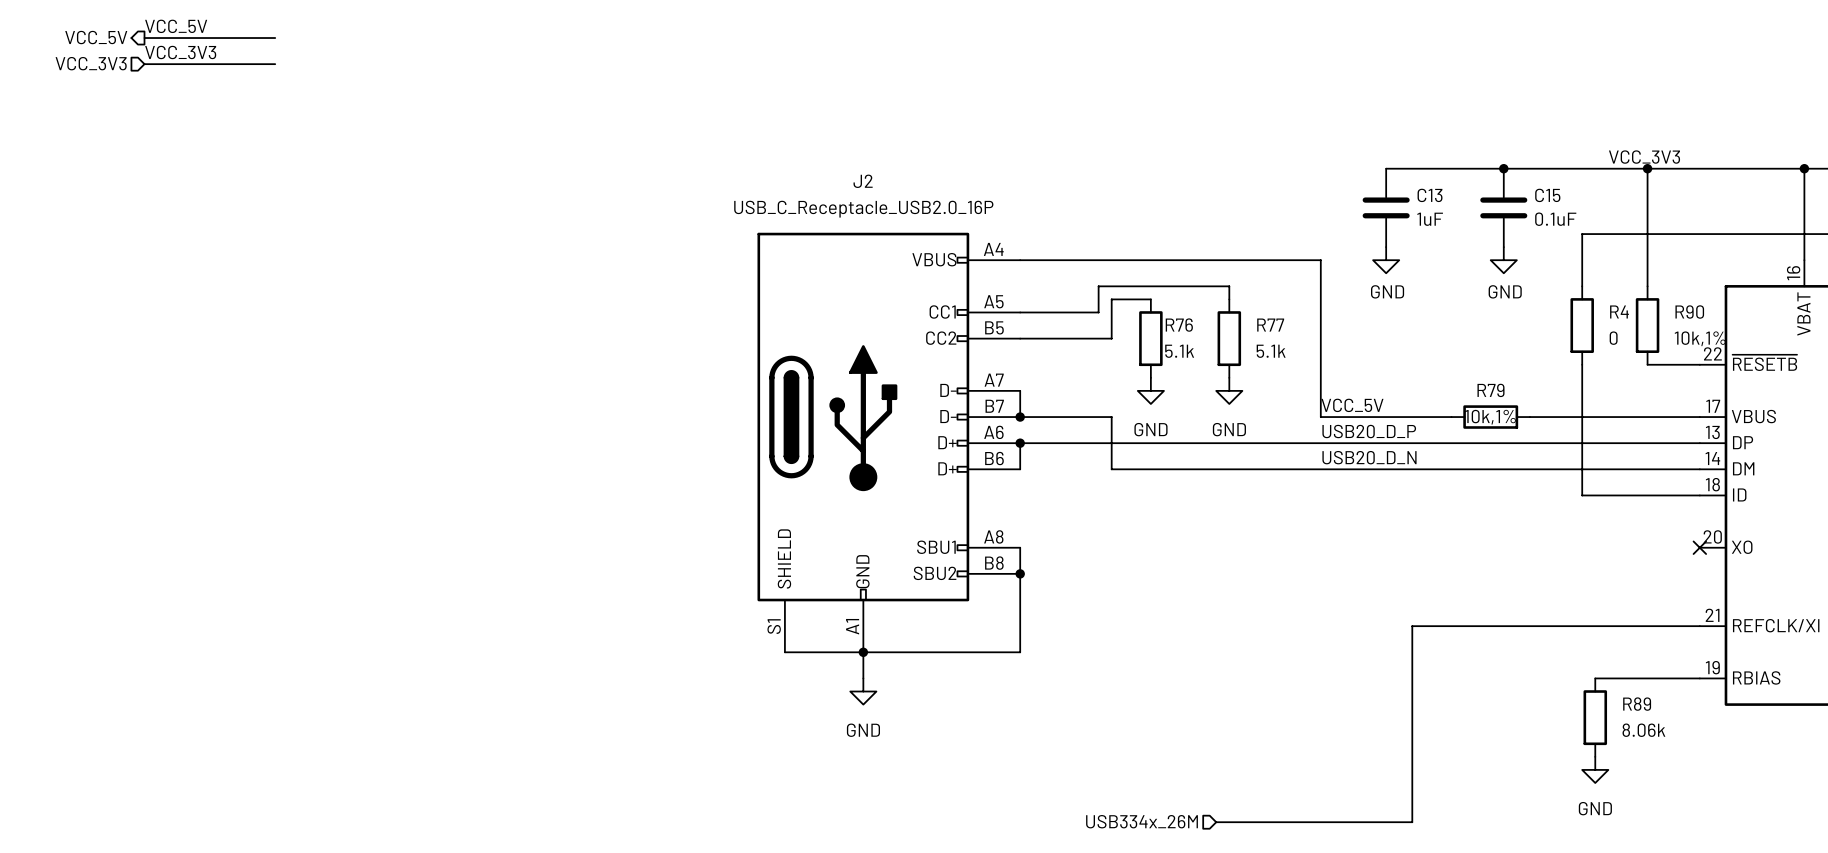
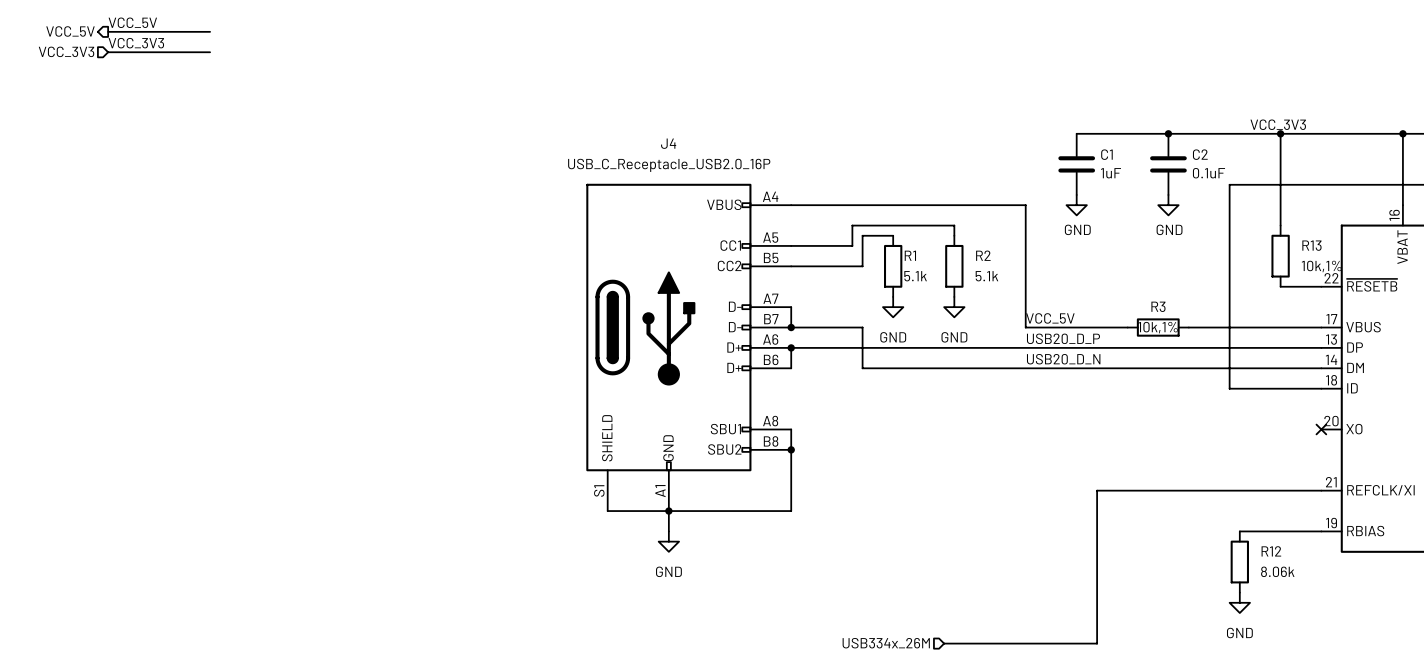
J2 name: J2 (863, 181) -> J4 (668, 143)
C13 name: C13 (1430, 195) -> C1 (1106, 154)
C15 name: C15 (1547, 195) -> C2 (1200, 154)
wire: none -> (1229, 225) (1229, 286)
R90 name: R90 (1689, 312) -> R13 (1311, 245)
R76 name: R76 (1179, 325) -> R1 (910, 255)
R77 name: R77 (1270, 325) -> R2 (983, 255)
R4: 0 (1582, 325) -> none
R79 name: R79 (1490, 390) -> R3 (1158, 306)
R89 name: R89 (1637, 704) -> R12 (1271, 551)

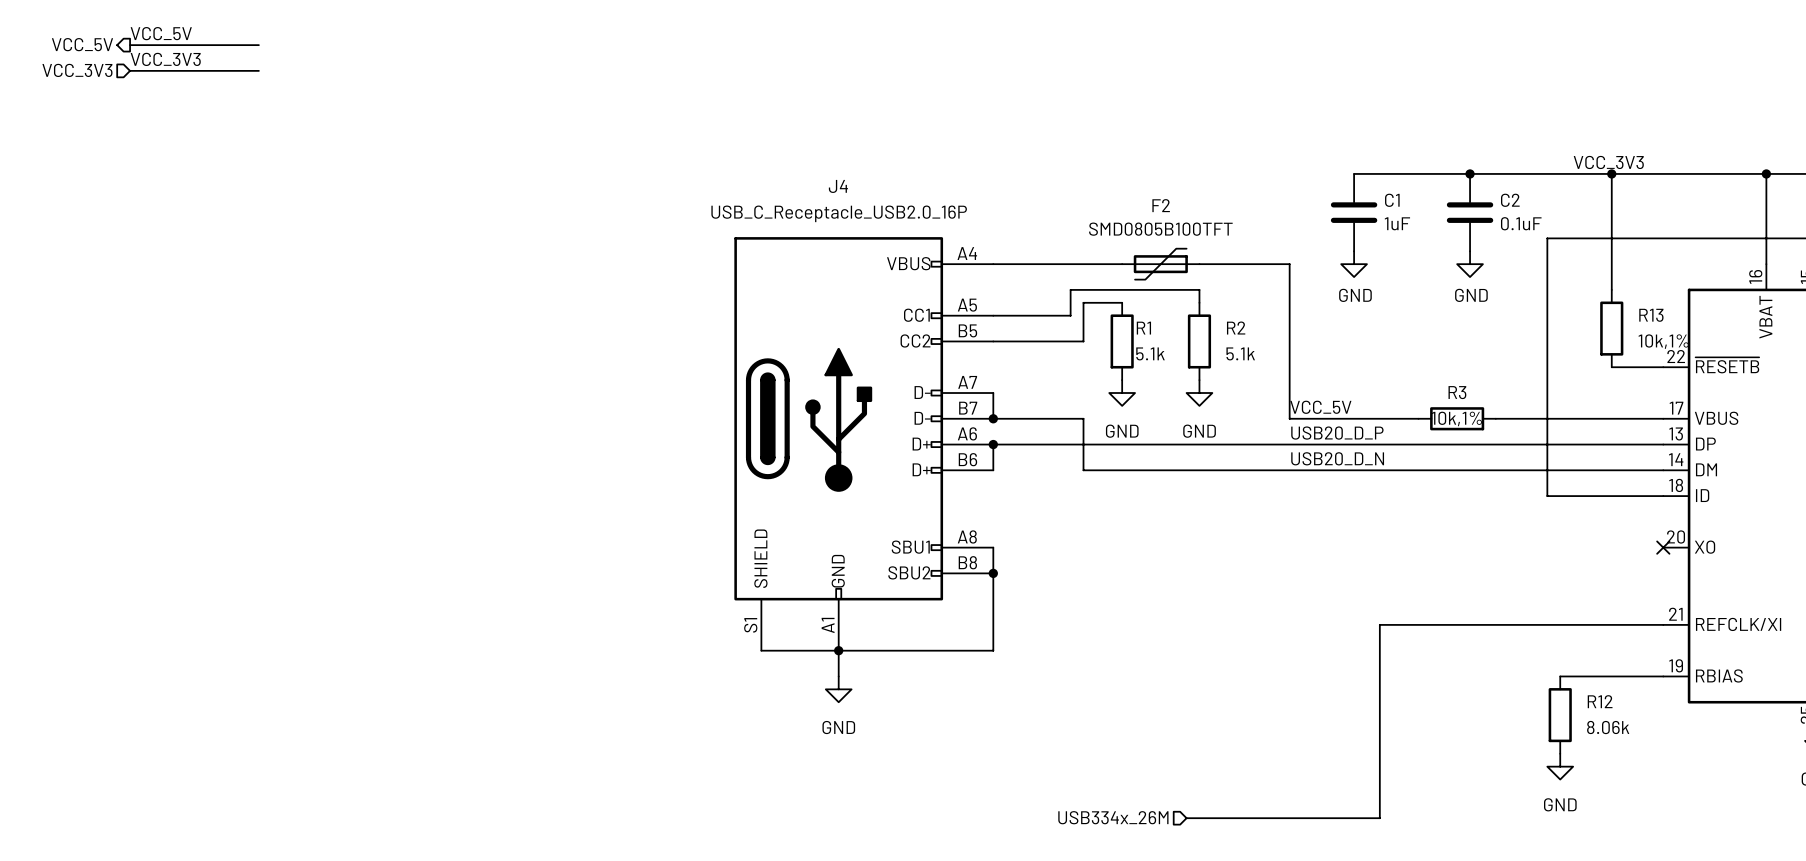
F2: none -> SMD0805B100TFT (1160, 264)

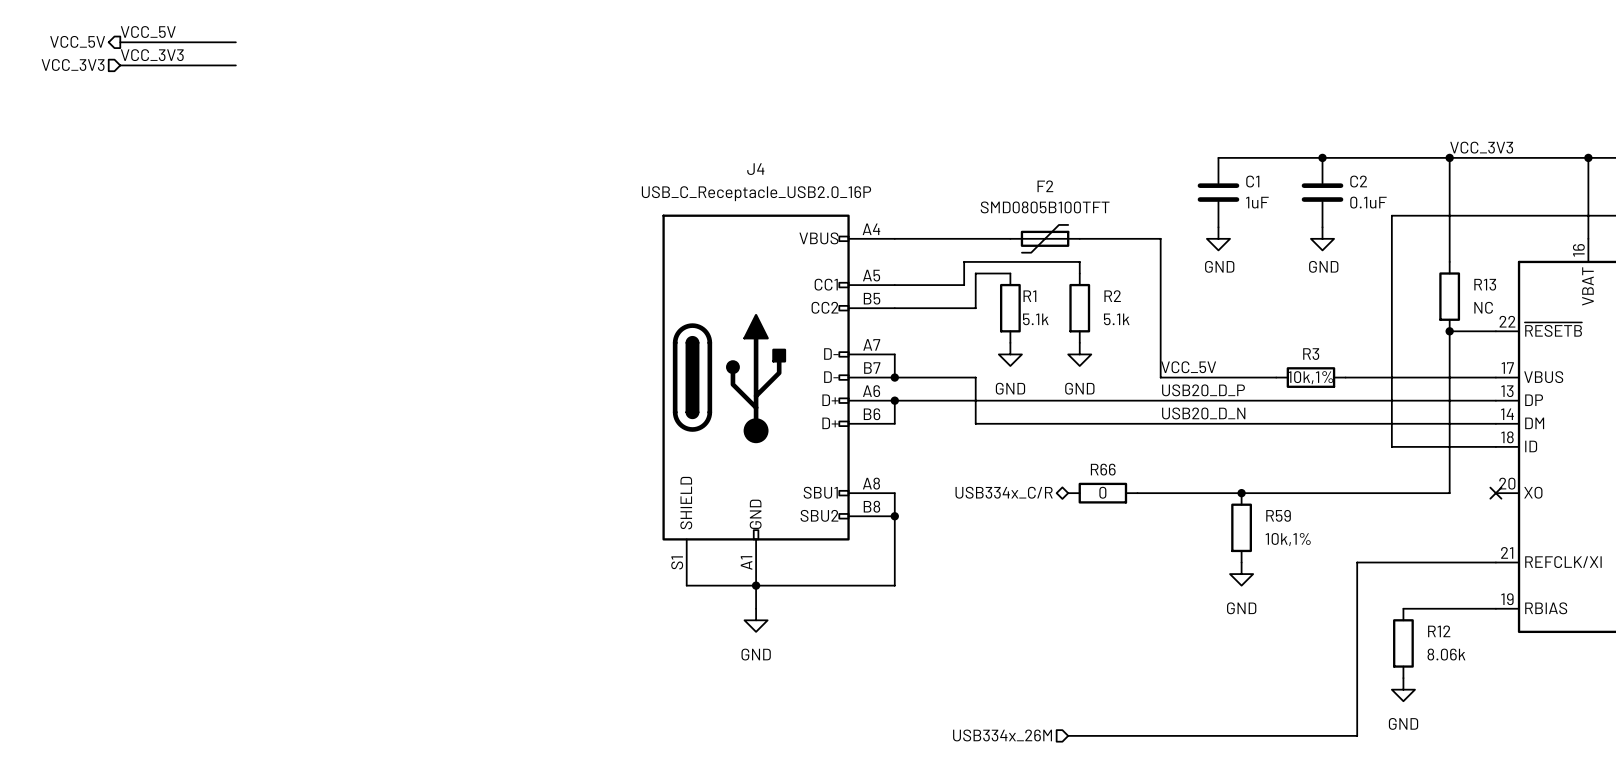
label position: VCC_3V3 (1608, 162) -> VCC_3V3 (1481, 147)
R13 value: 10k,1% (1663, 341) -> NC (1483, 307)
wire: none -> (1449, 331) (1449, 493) (1137, 493)
junction: none -> (1449, 331)
hierarchical label: none -> USB334x_C/R (1004, 492)
R66: none -> 0 (1102, 493)
junction: none -> (1241, 493)
R59: none -> 10k,1% (1241, 527)
wire: (1508, 624) (1379, 624) (1379, 818) -> (1357, 562) (1357, 735) (1241, 735)
power symbol: none -> GND (1241, 574)

